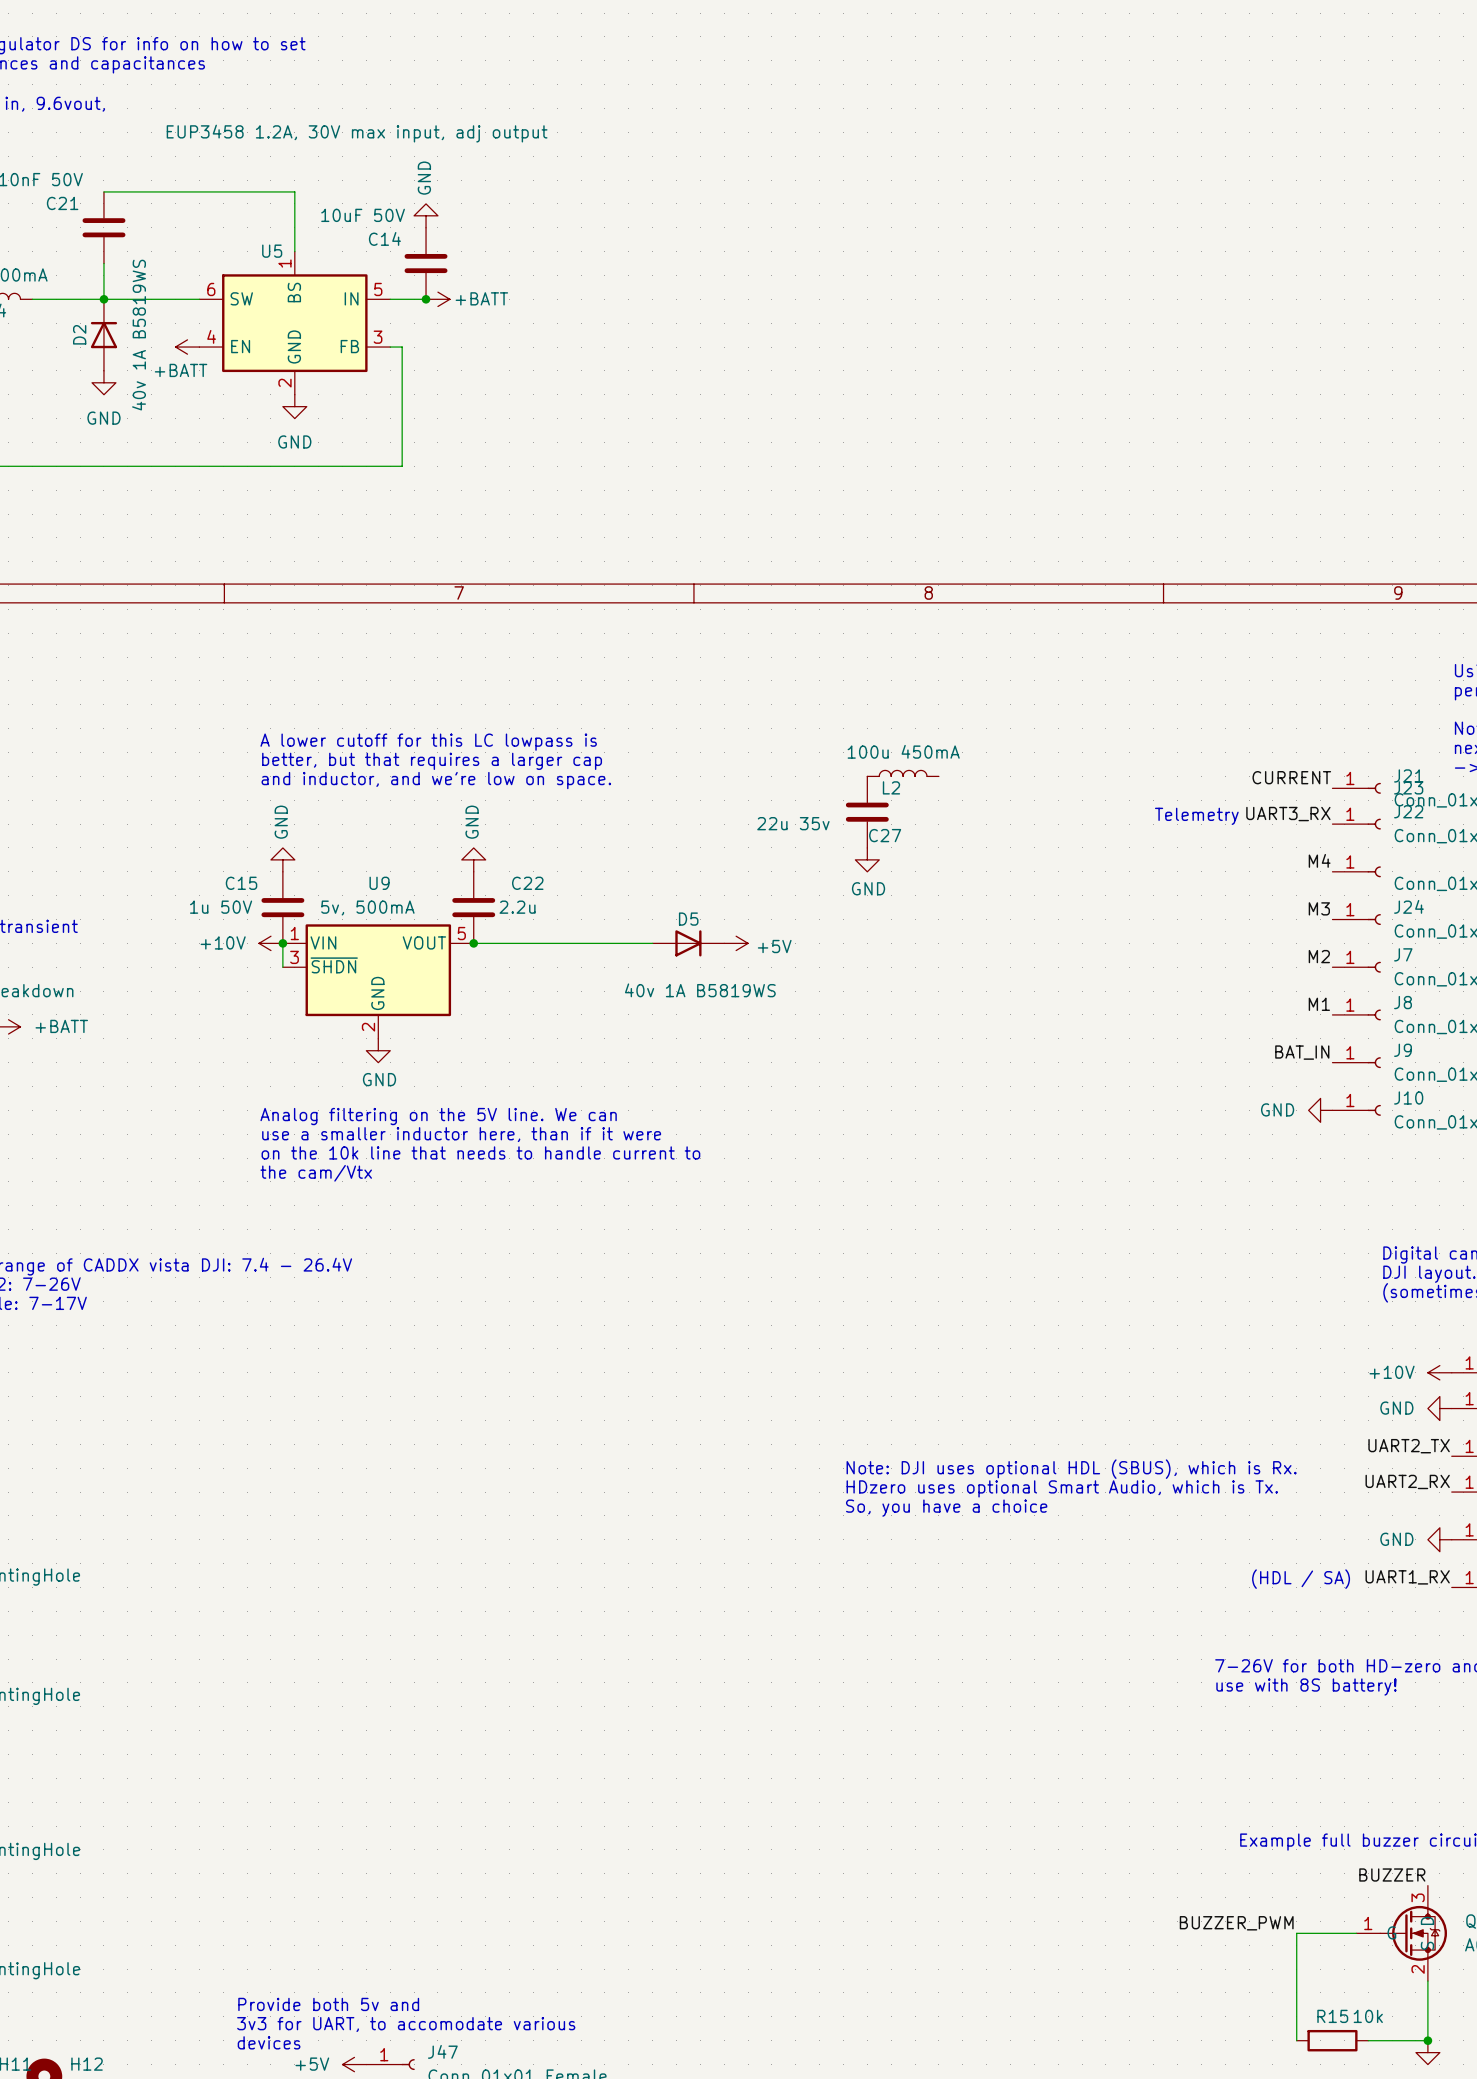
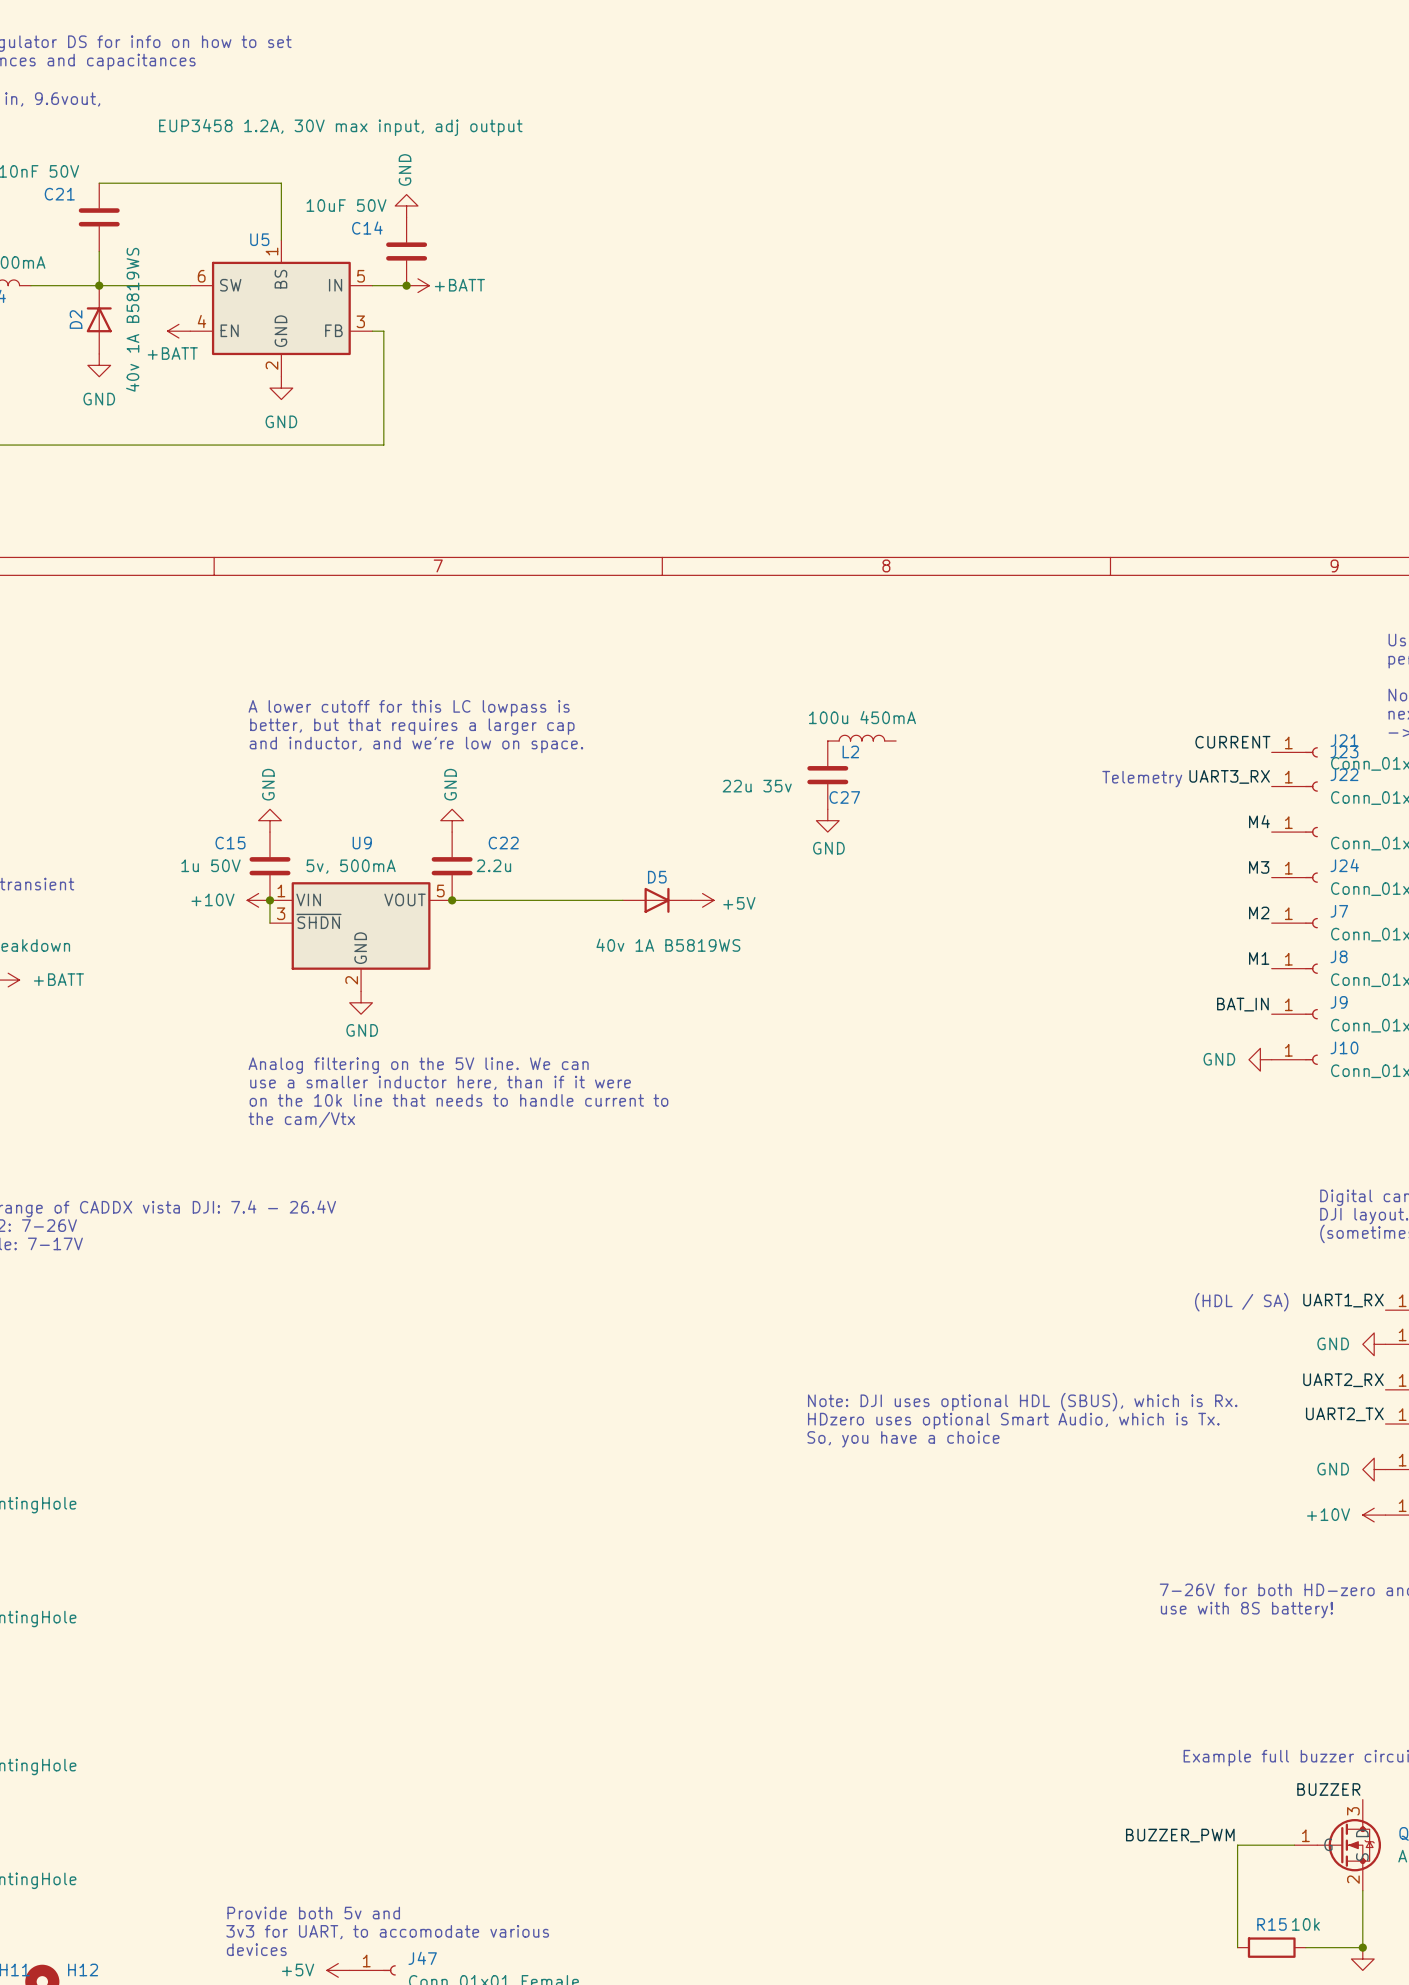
power symbol position: +10V (1439, 1372) -> +10V (1374, 1515)
label: UART2_TX (1409, 1446) -> UART2_RX (1343, 1380)
label: UART2_RX (1407, 1481) -> UART2_TX (1344, 1414)
label position: UART1_RX (1407, 1577) -> UART1_RX (1343, 1300)
text position: (HDL / SA) (1301, 1579) -> (HDL / SA) (1241, 1302)

